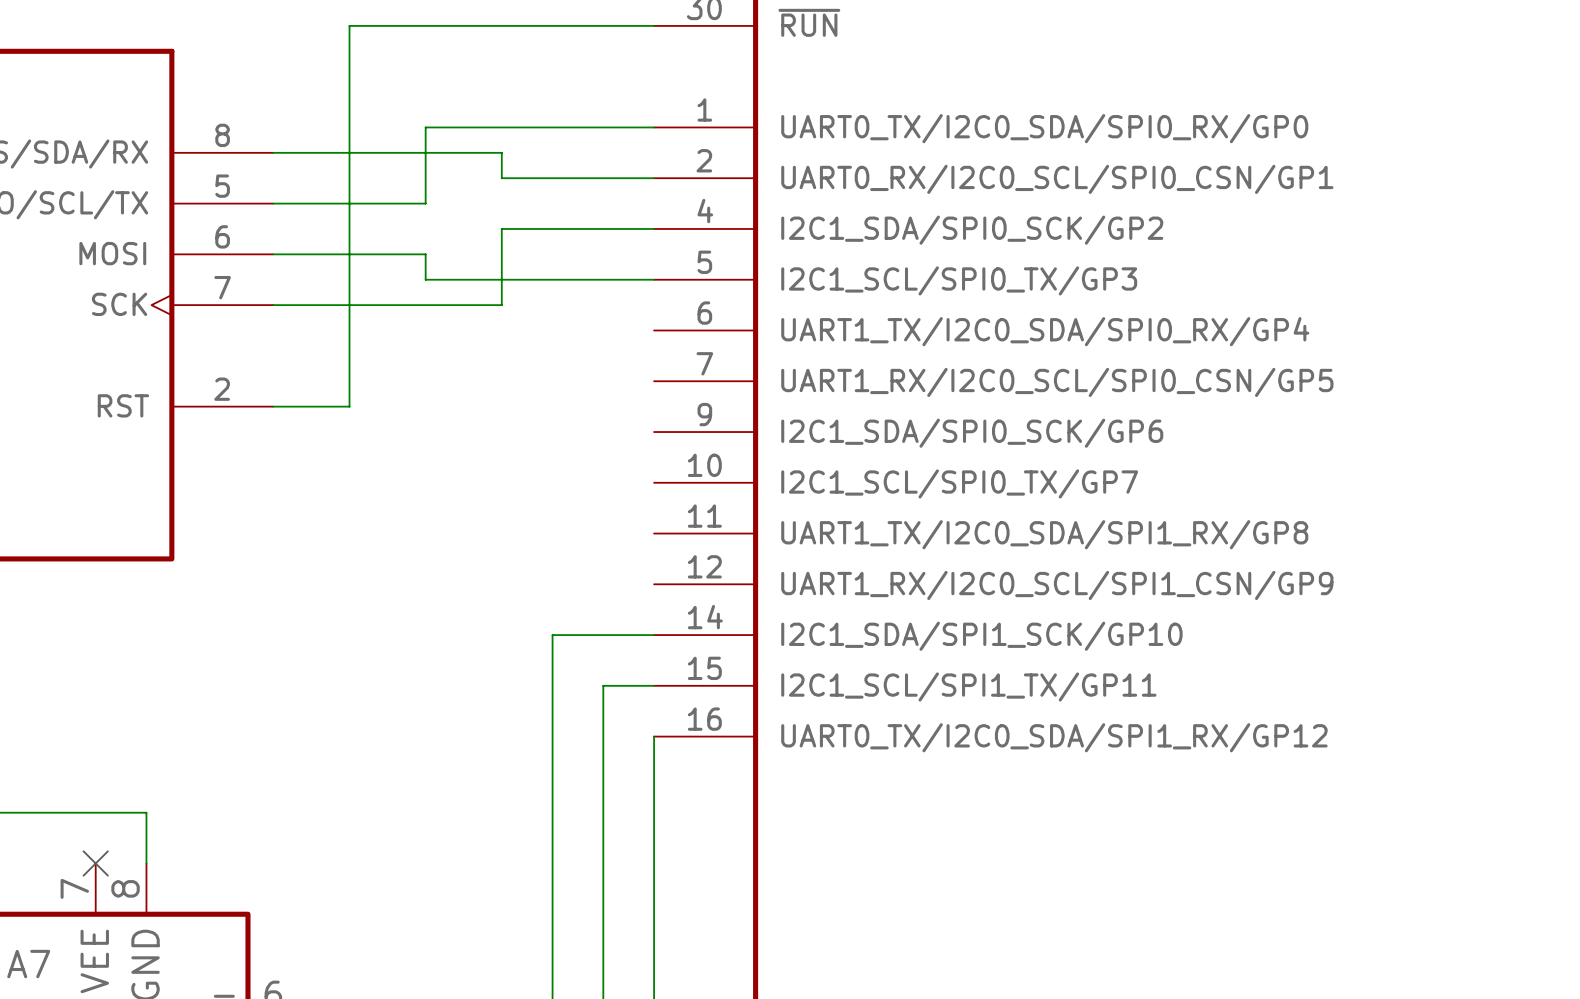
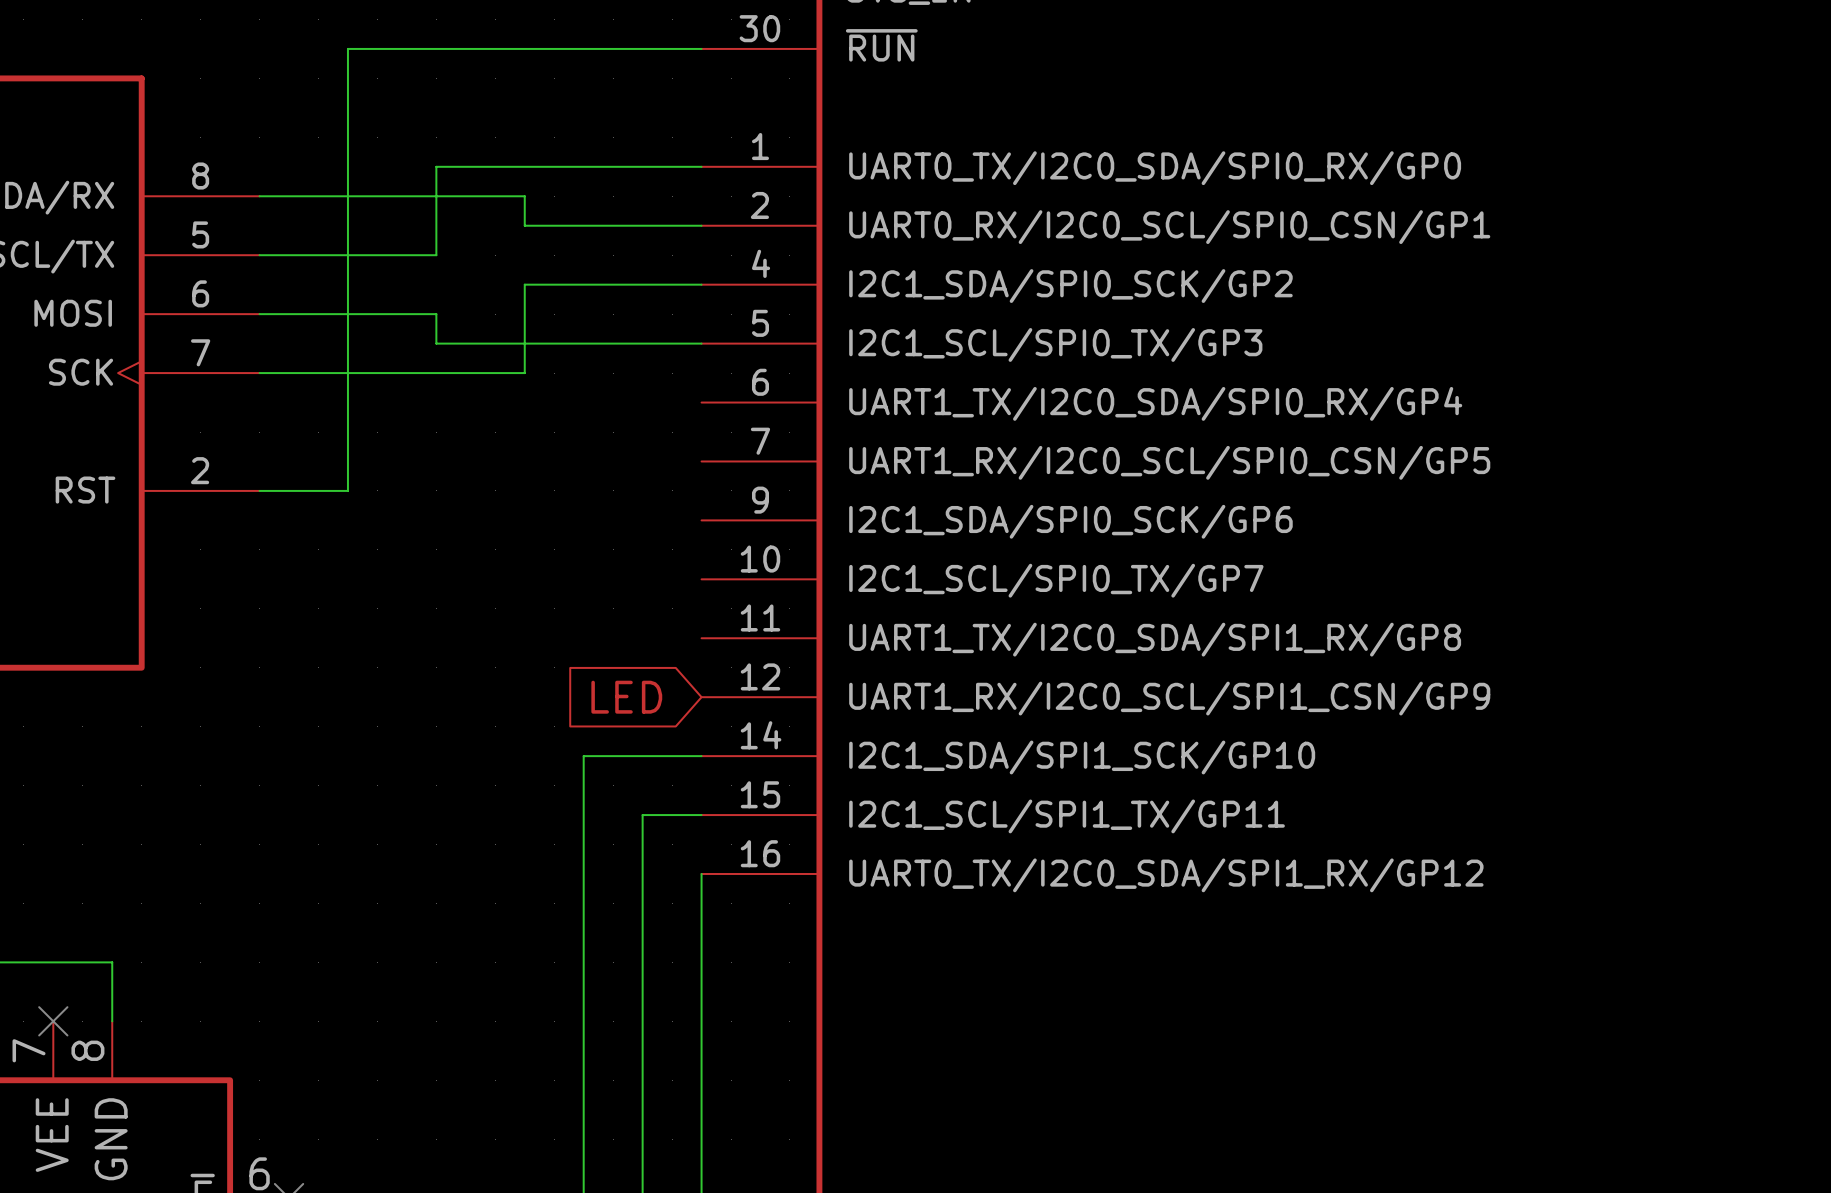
global label: none -> LED (626, 697)

